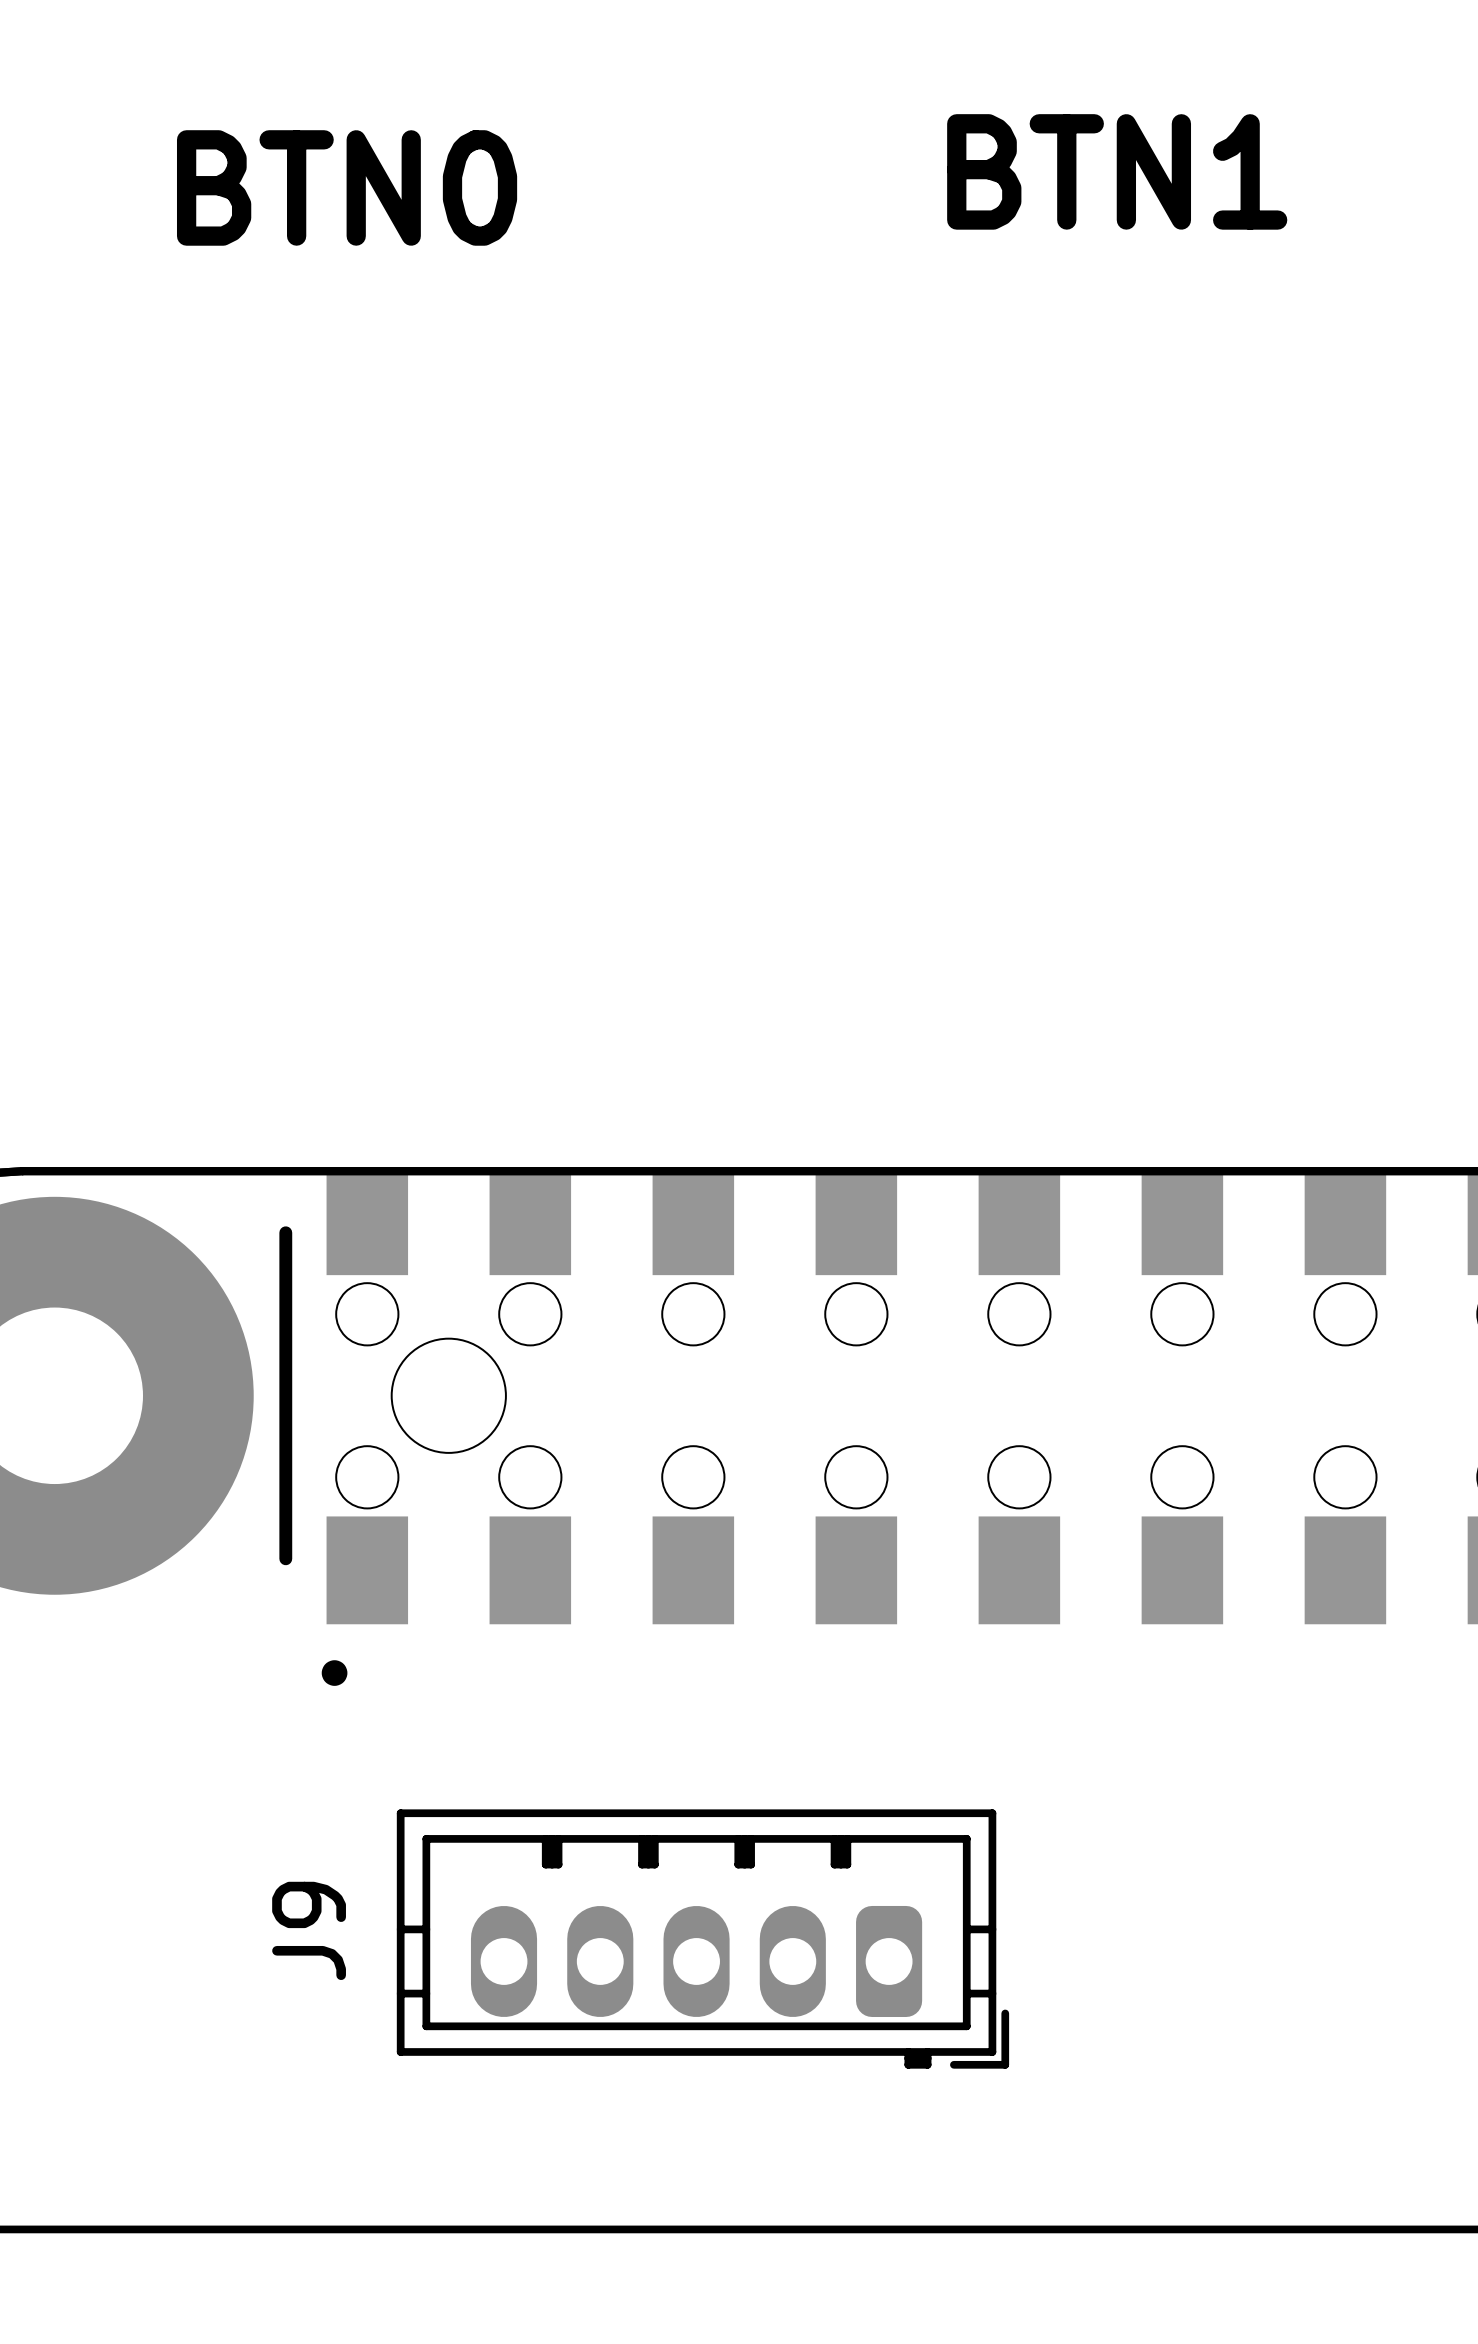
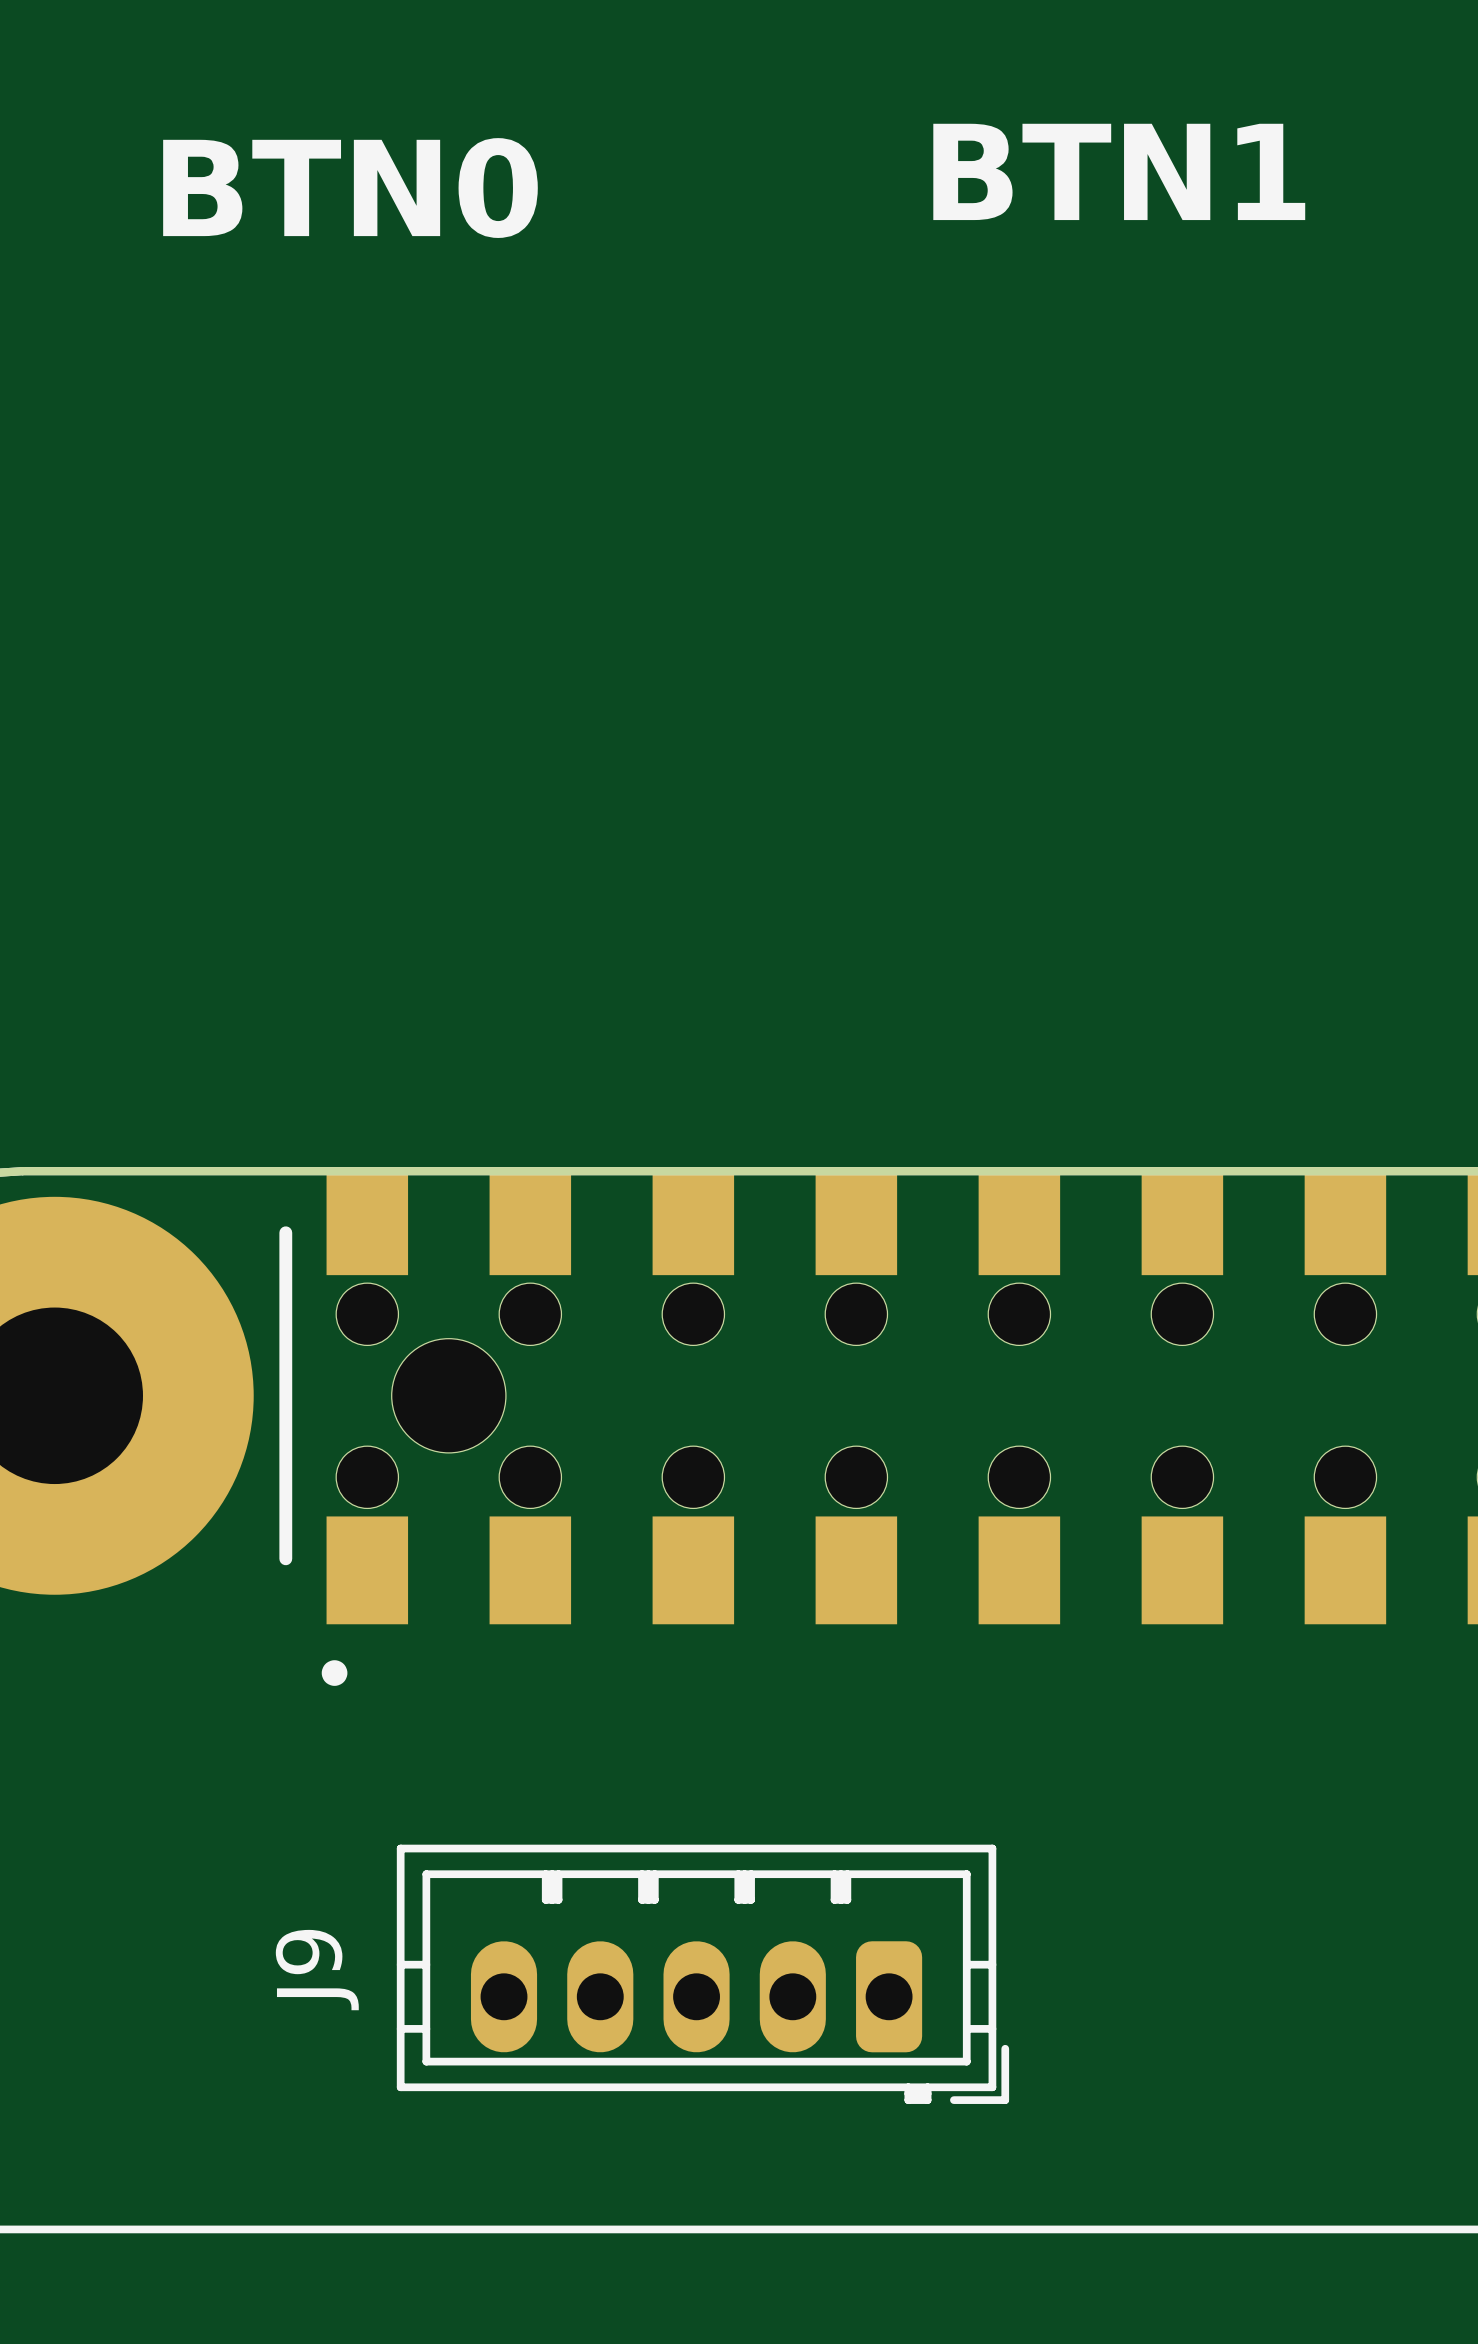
J9 position: (702, 1939) -> (702, 1974)

